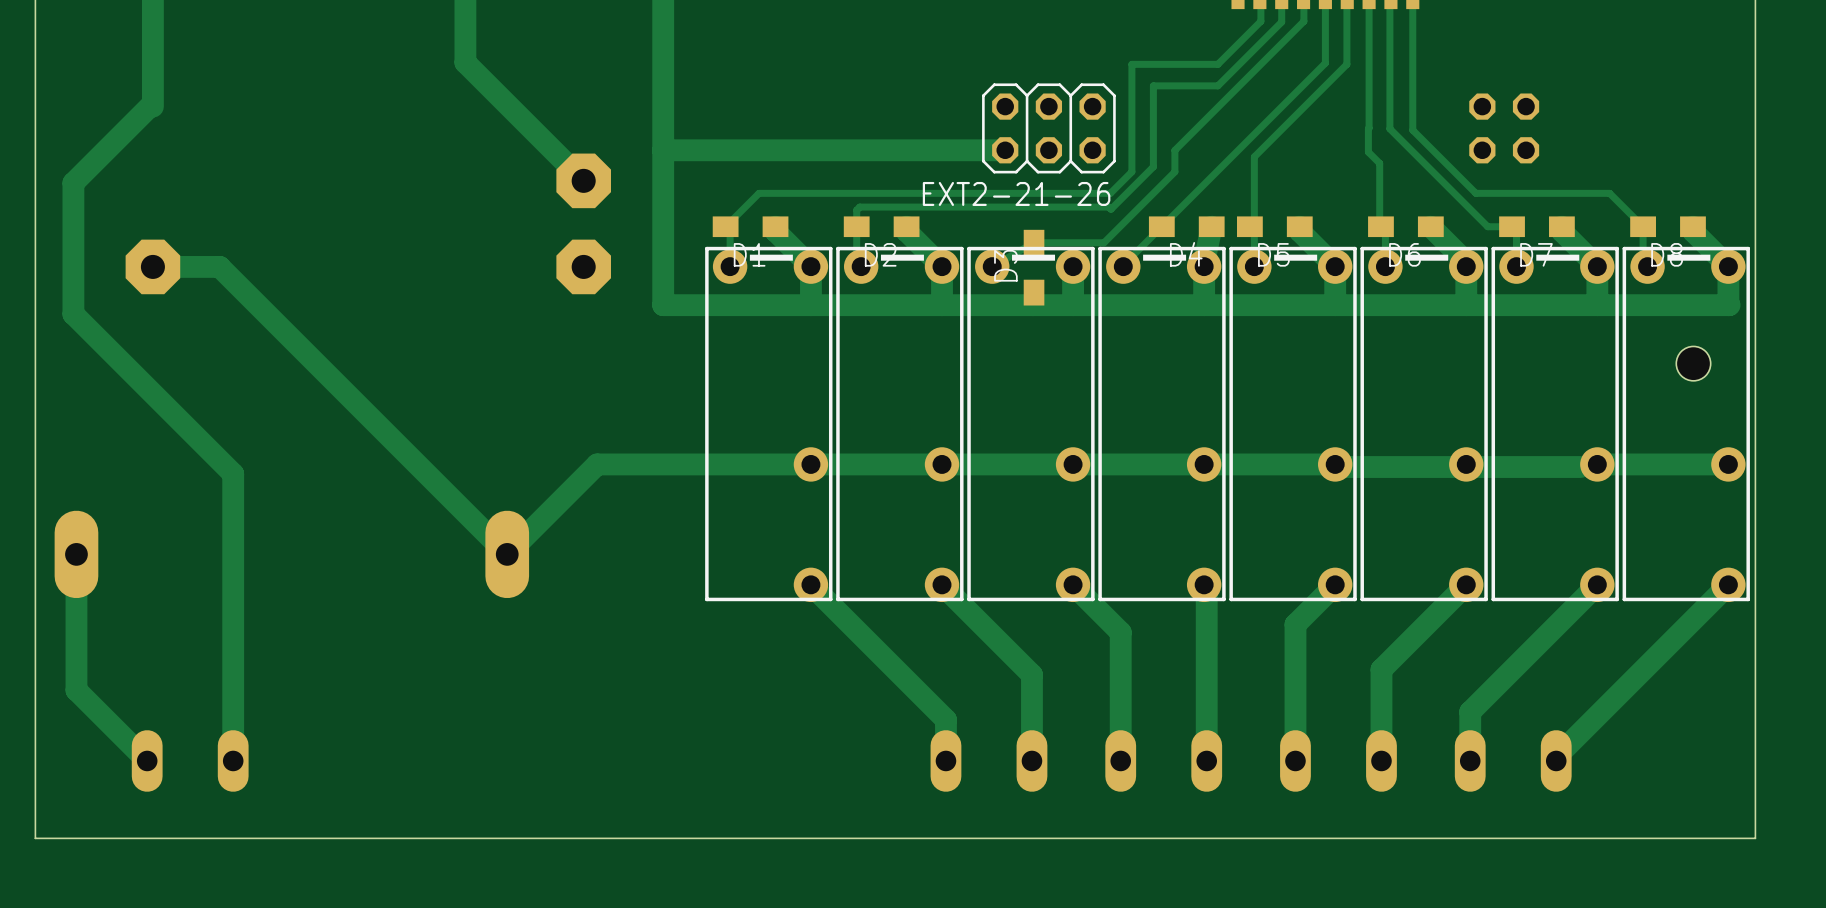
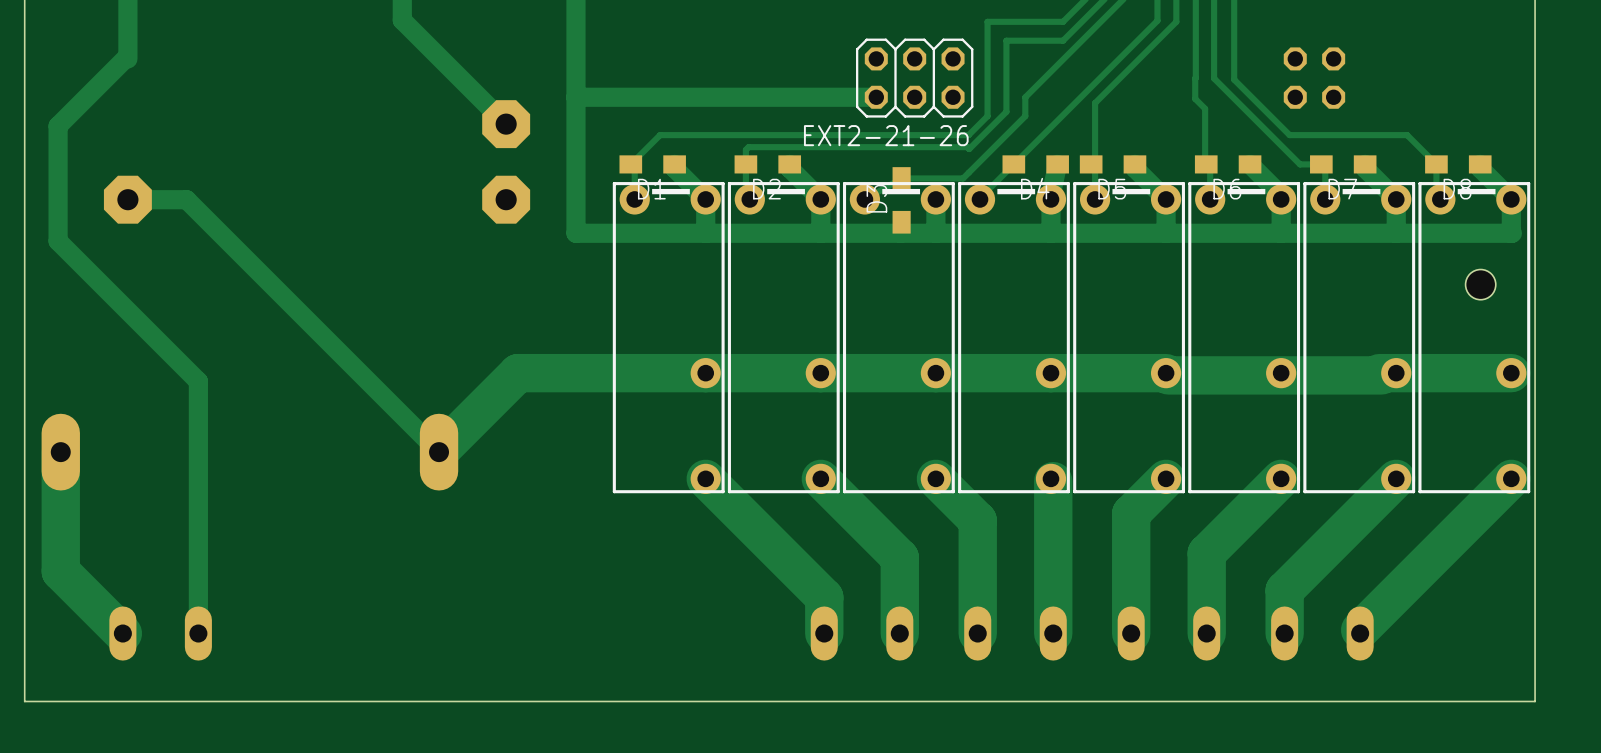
track width: thin (1335, 464) (597, 464) (507, 554) -> thick (1166, 373) (518, 373) (439, 452)
track width: thin (1728, 464) (1578, 464) -> thick (1511, 373) (1379, 373)
track width: thin (1580, 467) (1337, 467) -> thick (1381, 375) (1168, 375)
track width: thin (76, 554) (76, 690) (147, 760) -> thick (60, 452) (60, 571) (122, 633)
track width: thin (810, 584) (945, 719) (945, 760) -> thick (705, 478) (824, 597) (824, 633)
track width: thin (942, 584) (1031, 674) (1031, 760) -> thick (820, 478) (899, 557) (899, 633)
track width: thin (1073, 584) (1120, 632) (1120, 760) -> thick (935, 478) (977, 520) (977, 633)
track width: thin (1335, 584) (1295, 624) (1295, 760) -> thick (1166, 478) (1131, 513) (1131, 633)
track width: thin (1466, 584) (1381, 669) (1381, 760) -> thick (1281, 478) (1206, 553) (1206, 633)
track width: thin (1597, 584) (1470, 711) (1470, 760) -> thick (1396, 478) (1284, 590) (1284, 633)
track width: thin (1728, 584) (1556, 757) -> thick (1511, 478) (1360, 630)
track width: thin (1206, 587) (1206, 760) -> thick (1053, 481) (1053, 633)

